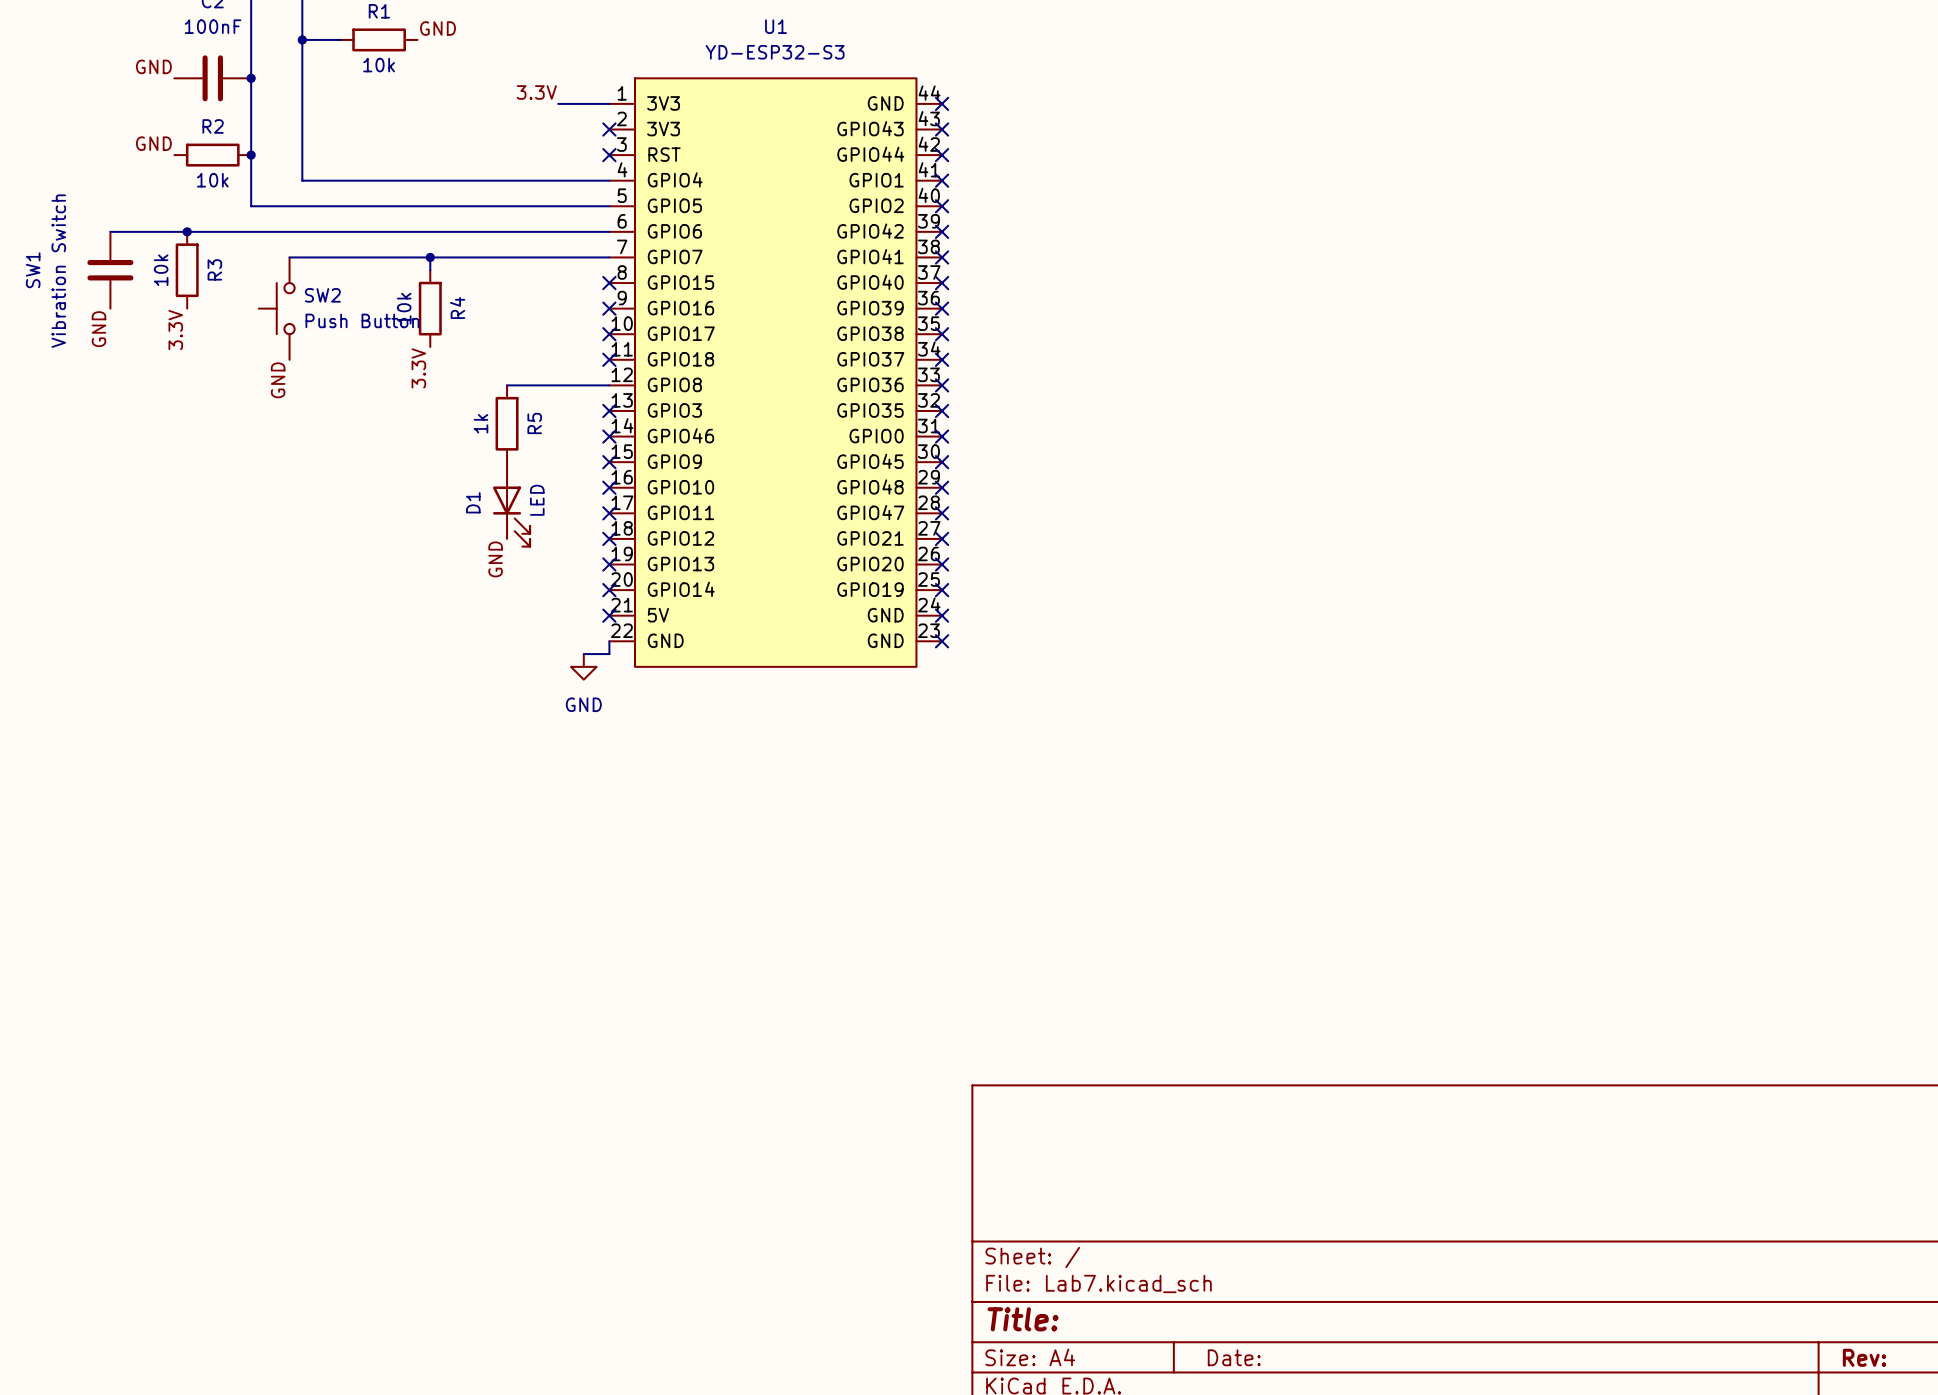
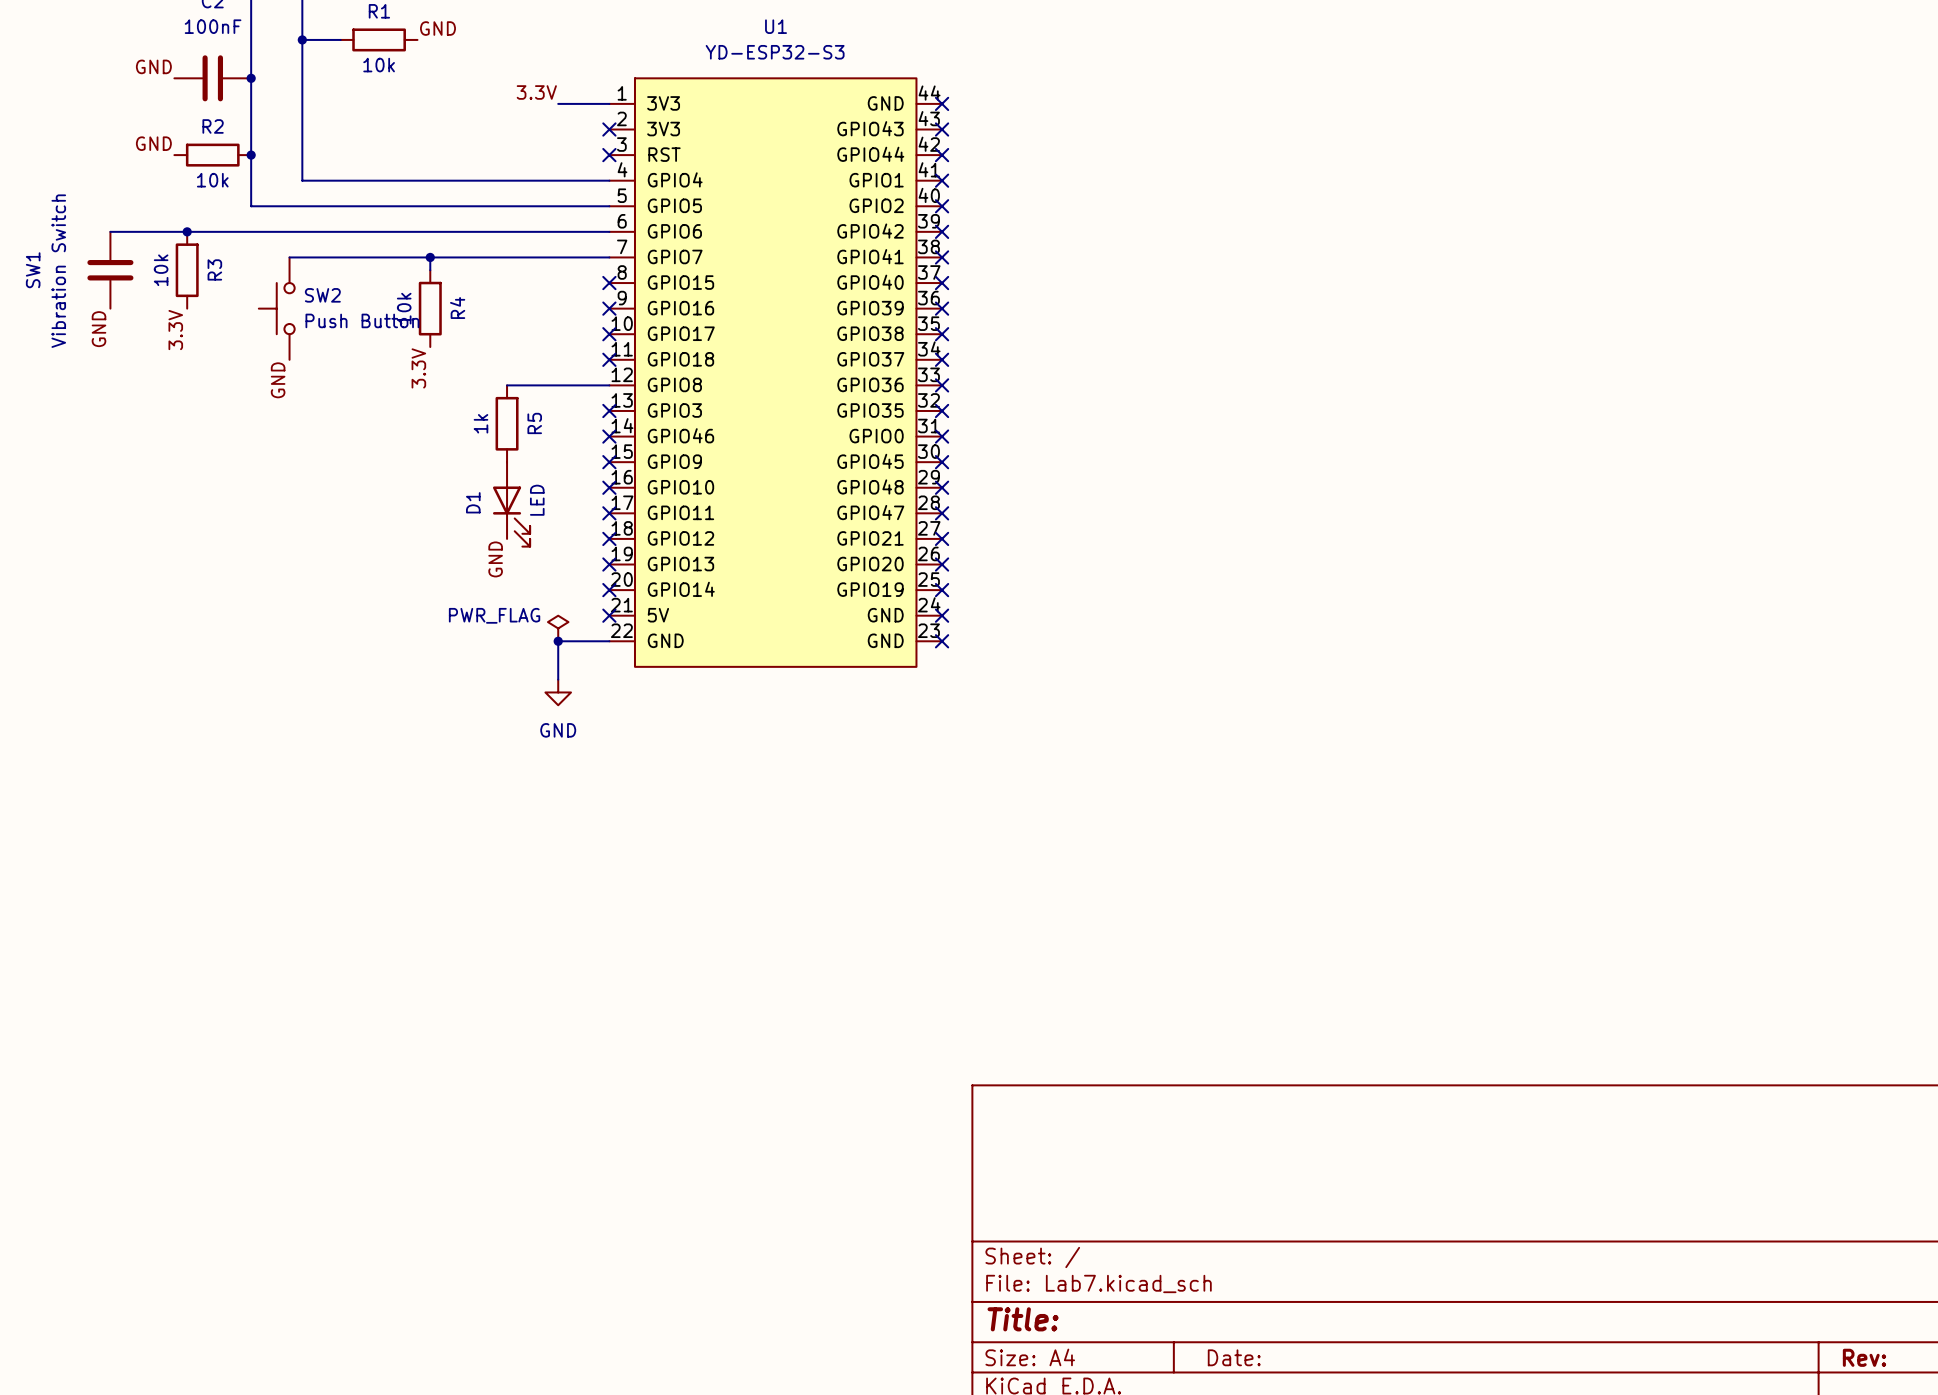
power symbol: none -> PWR_FLAG (558, 628)
junction: none -> (558, 641)
wire: (609, 641) (609, 654) (583, 654) -> (609, 641) (558, 641) (558, 679)
power symbol position: GND (583, 666) -> GND (558, 692)

